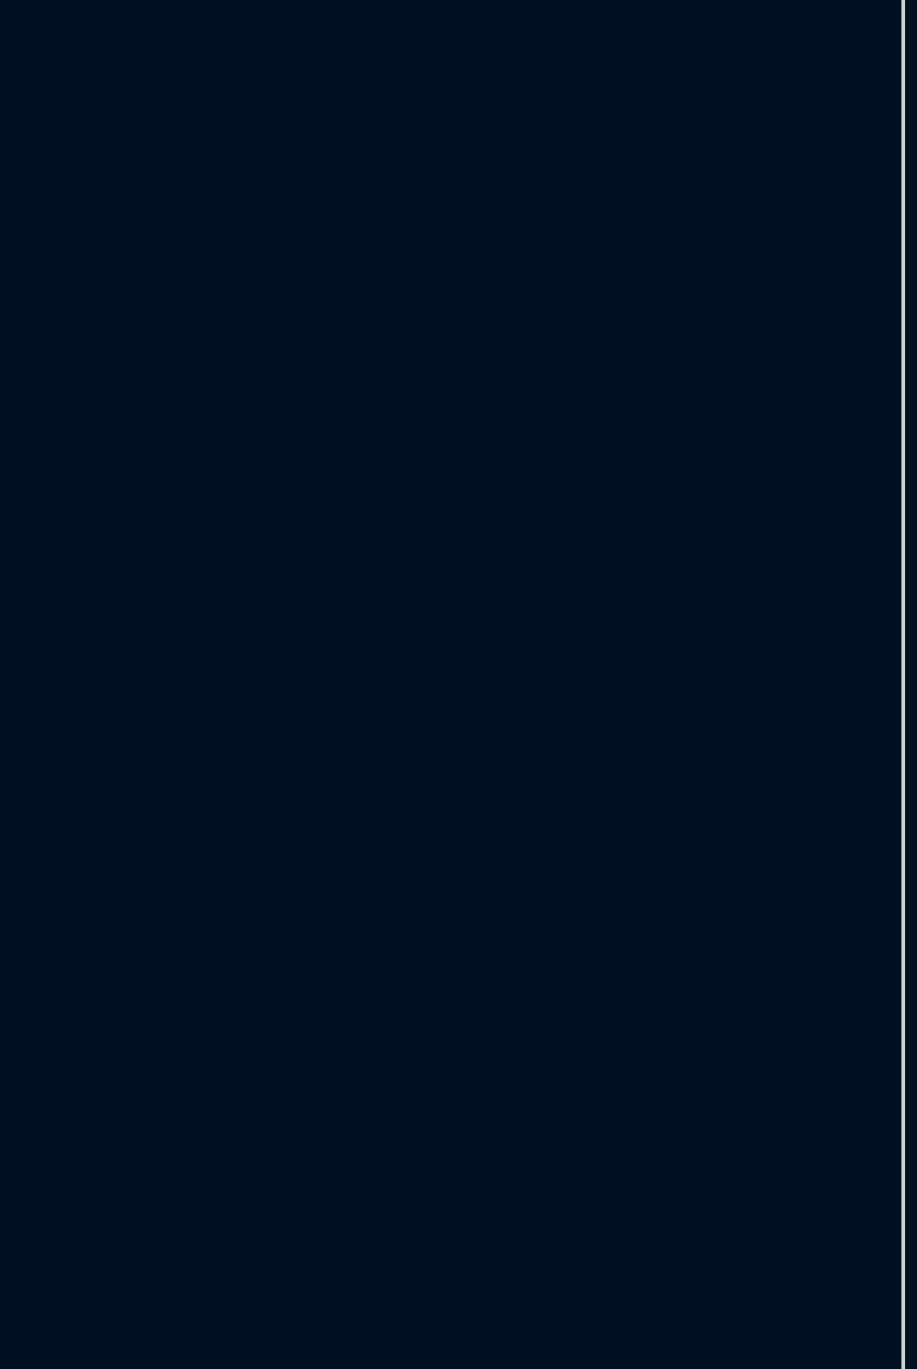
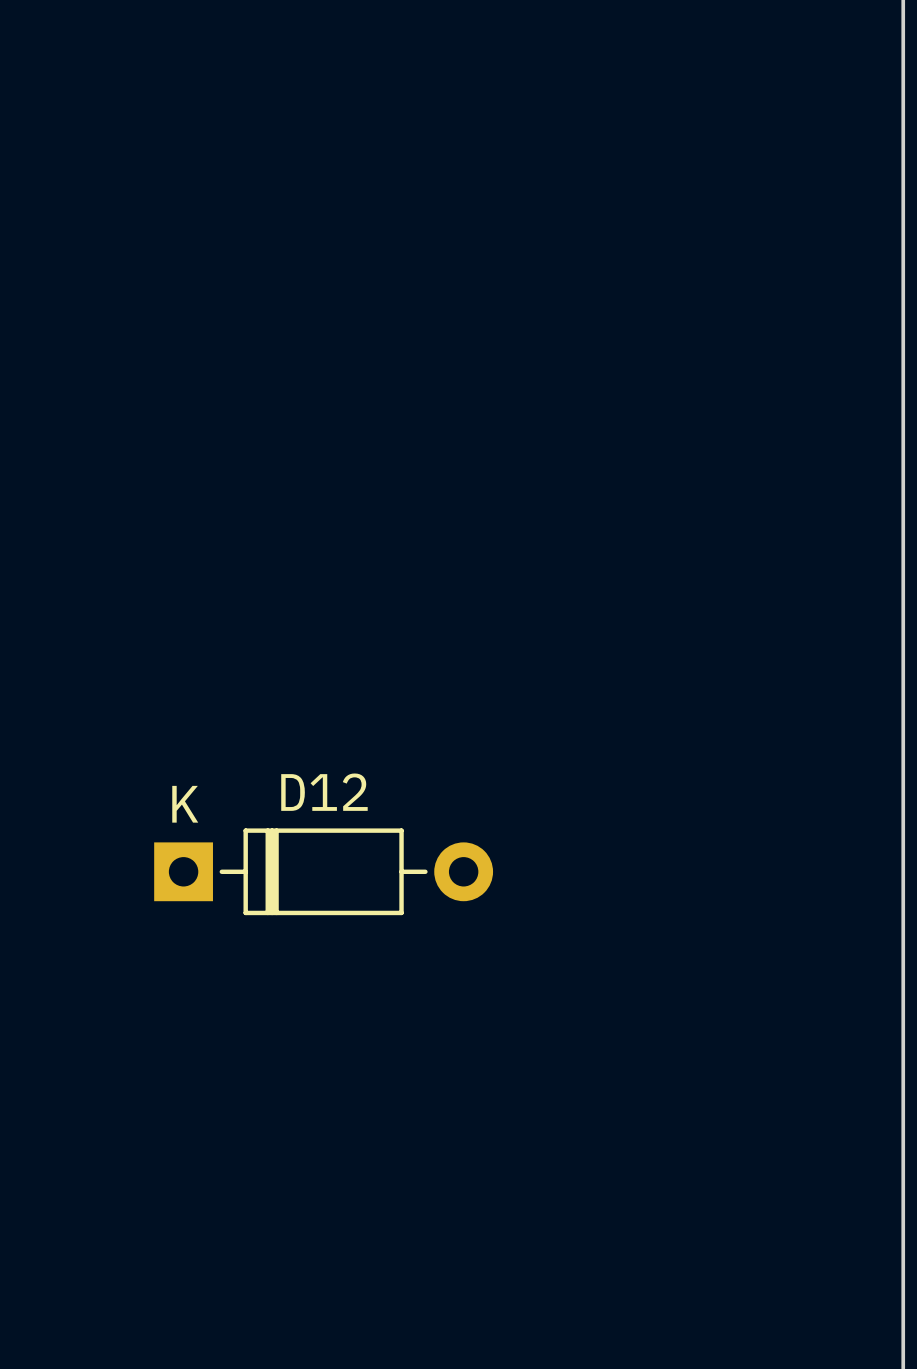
D12: none -> (323, 871)

